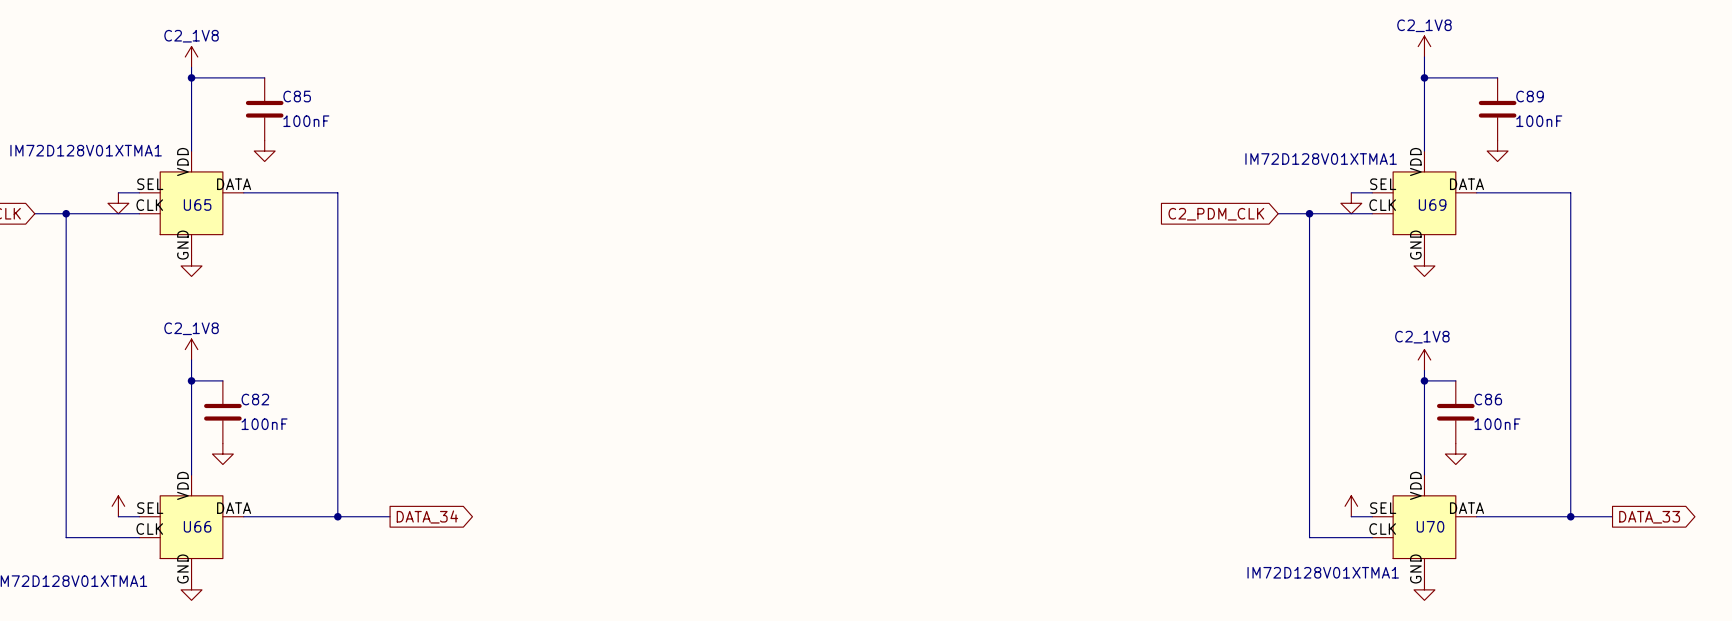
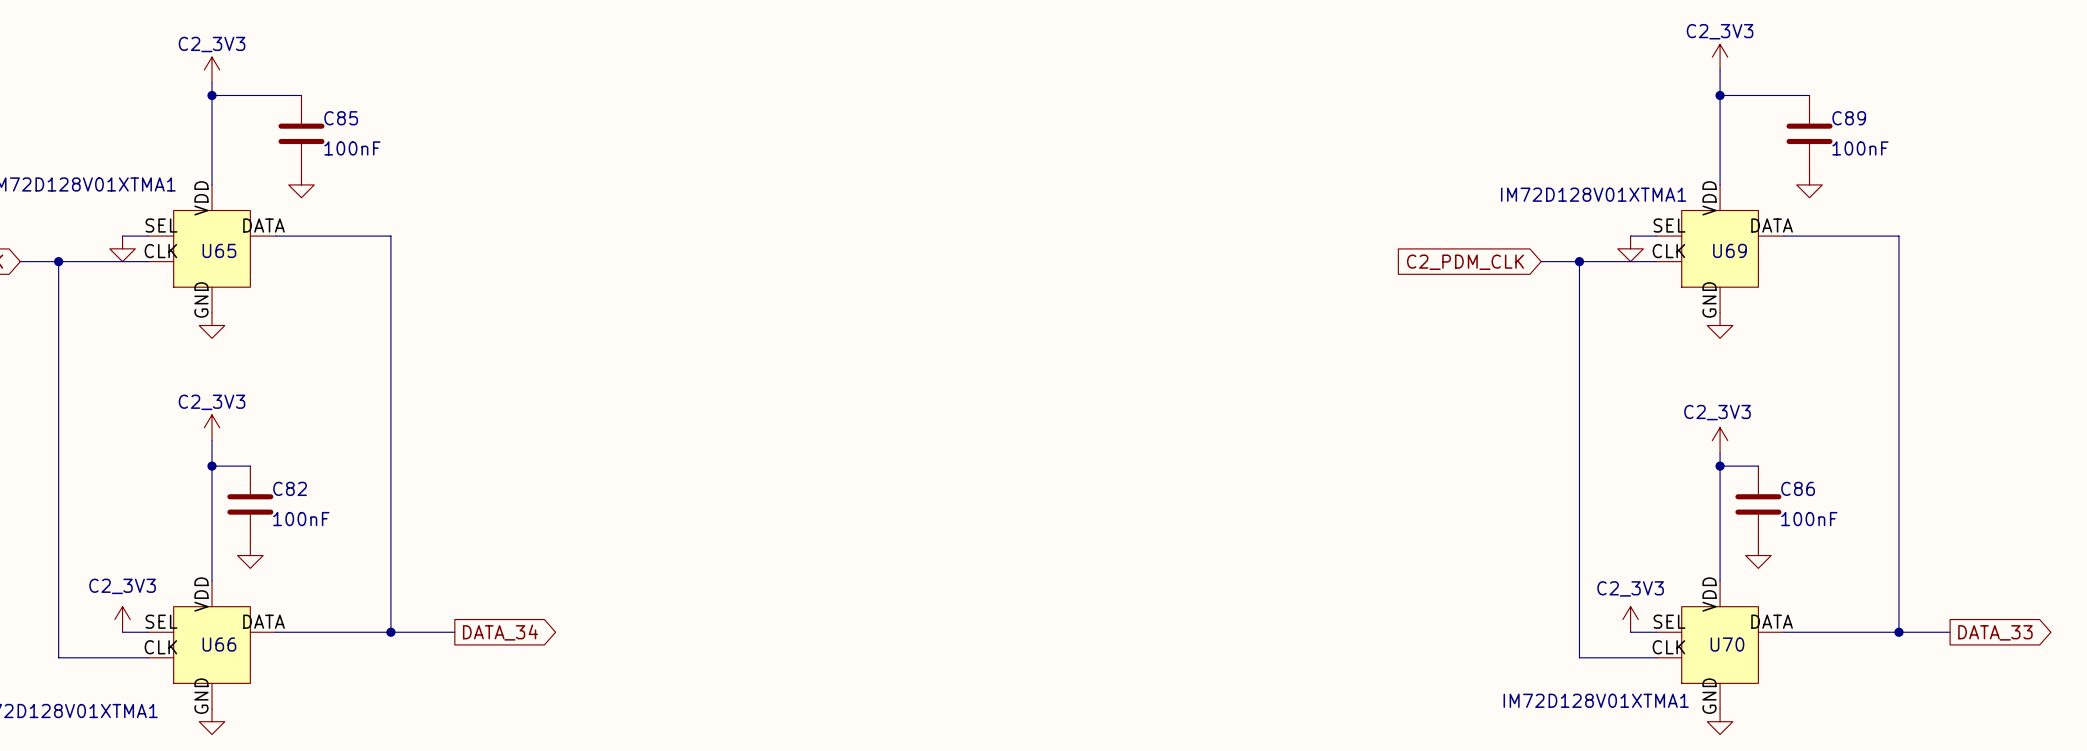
power symbol: C2_1V8 (1424, 46) -> C2_3V3 (1720, 57)
power symbol: C2_1V8 (191, 57) -> C2_3V3 (212, 69)
power symbol: C2_1V8 (191, 349) -> C2_3V3 (212, 427)
power symbol: C2_1V8 (1424, 360) -> C2_3V3 (1720, 440)
power symbol text: none -> C2_3V3 (122, 586)
power symbol text: none -> C2_3V3 (1630, 588)

